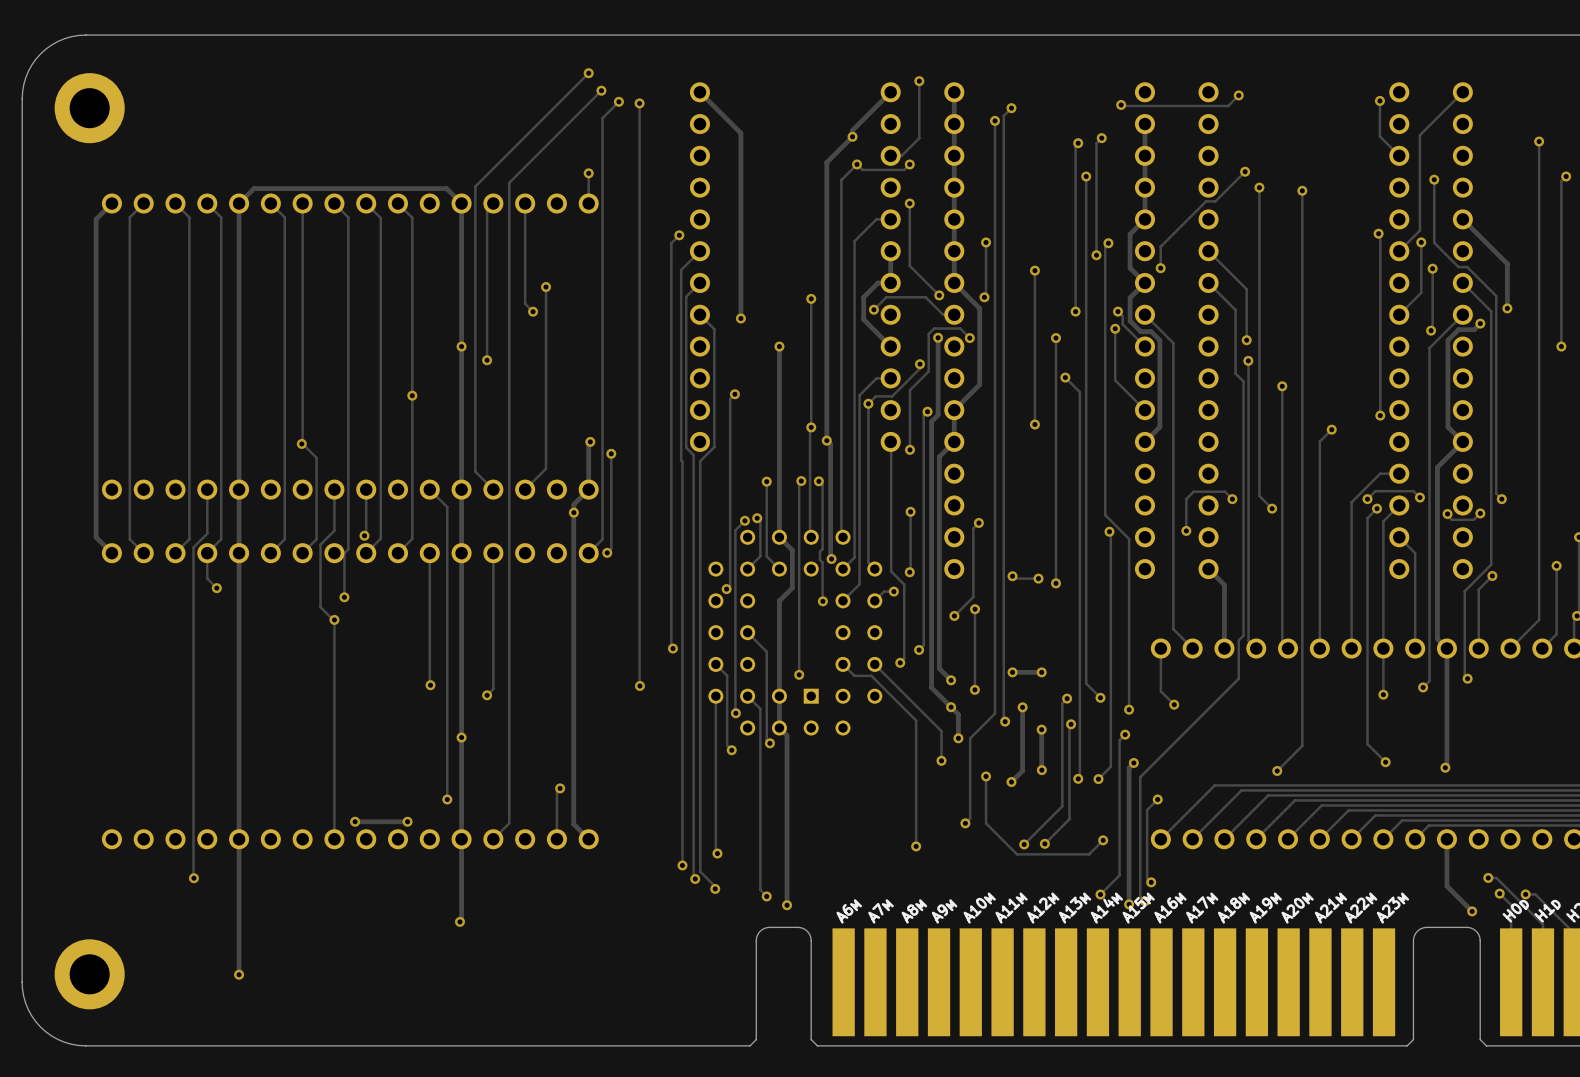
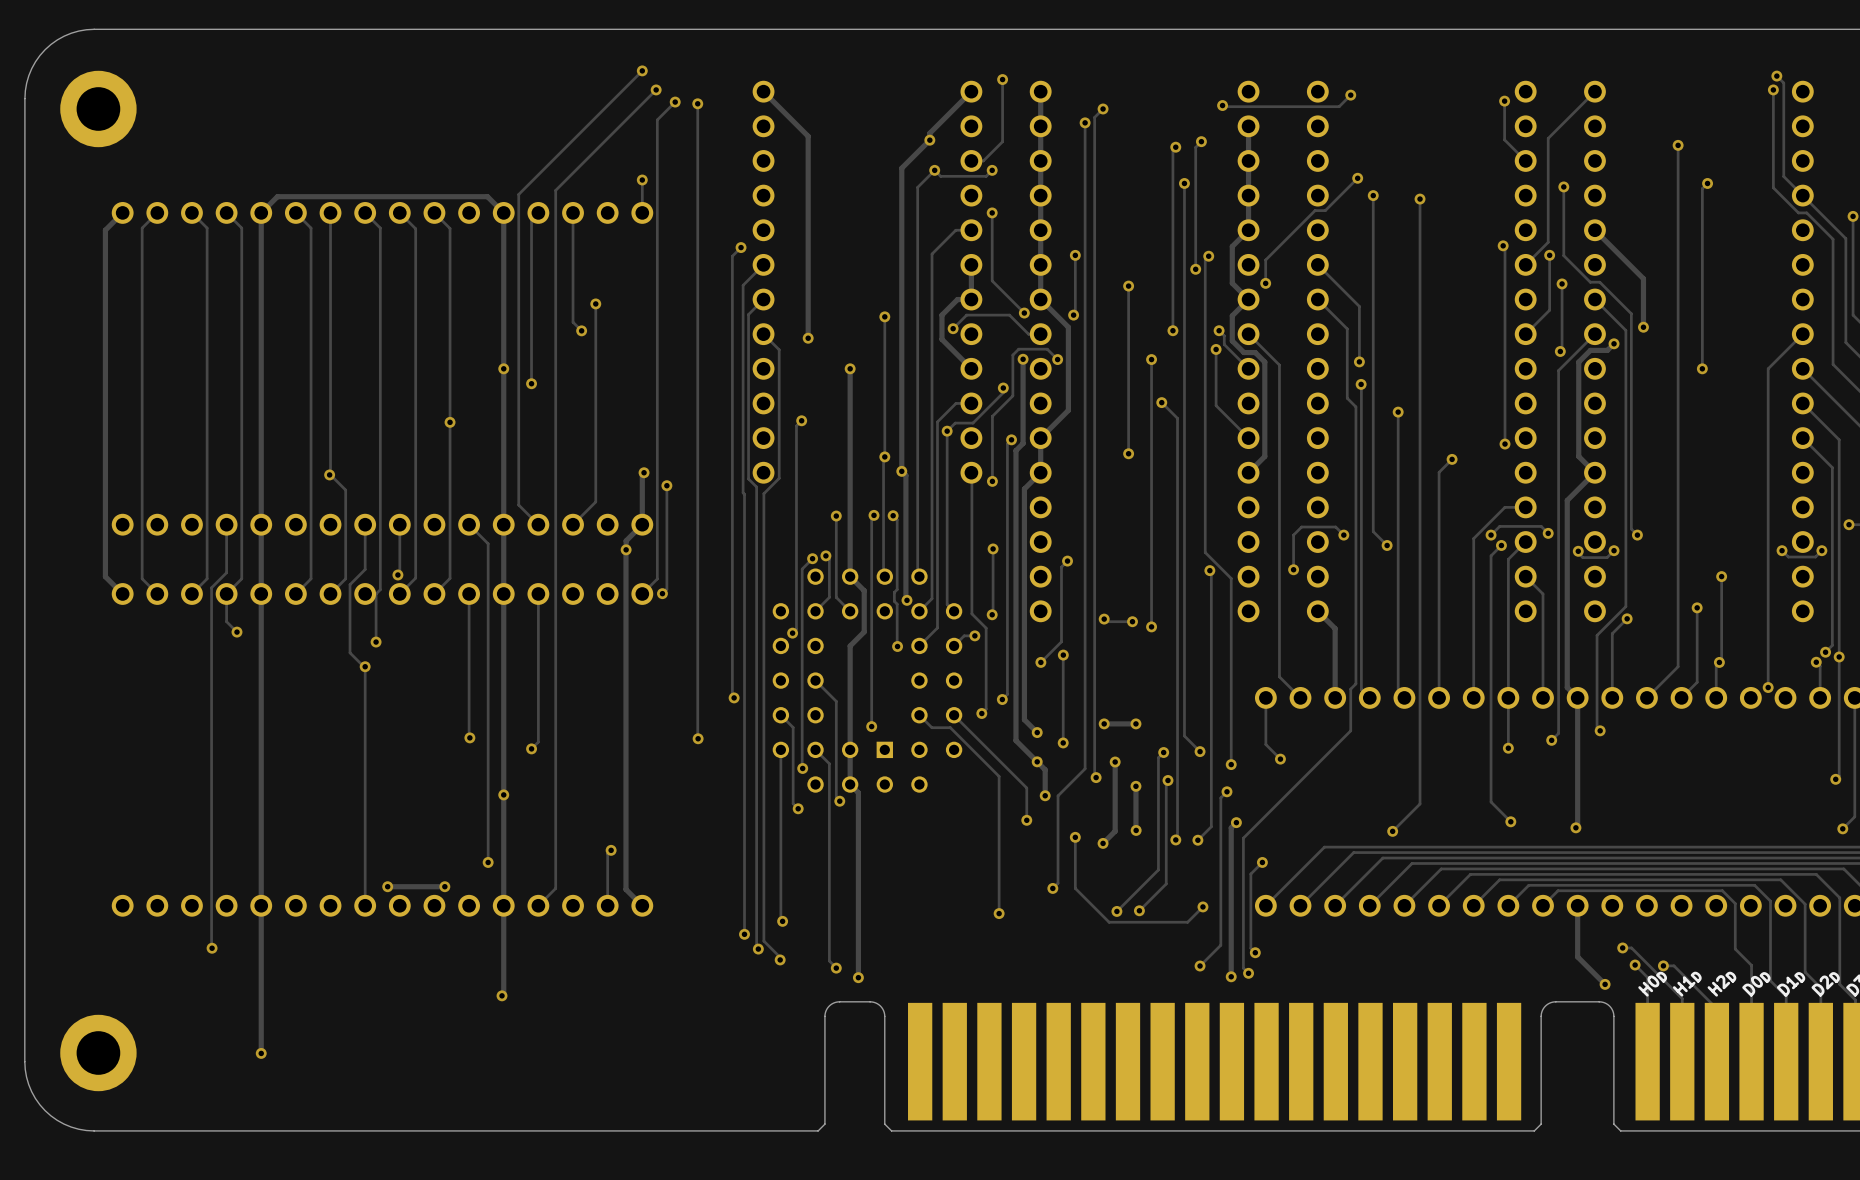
text: A10M (979, 908) -> none
text: A11M (1011, 908) -> none
text: A12M (1043, 908) -> none
text: A13M (1075, 908) -> none
text: A14M (1106, 908) -> none
text: A15M (1138, 908) -> none
text: A16M (1170, 908) -> none
text: A17M (1202, 908) -> none
text: A18M (1234, 908) -> none
text: A19M (1265, 908) -> none
text: A20M (1297, 908) -> none
text: A21M (1330, 908) -> none
text: A22M (1361, 908) -> none
text: A23M (1392, 908) -> none
text: A6M (849, 911) -> none
text: A7M (880, 911) -> none
text: A8M (914, 911) -> none
text: A9M (944, 911) -> none

